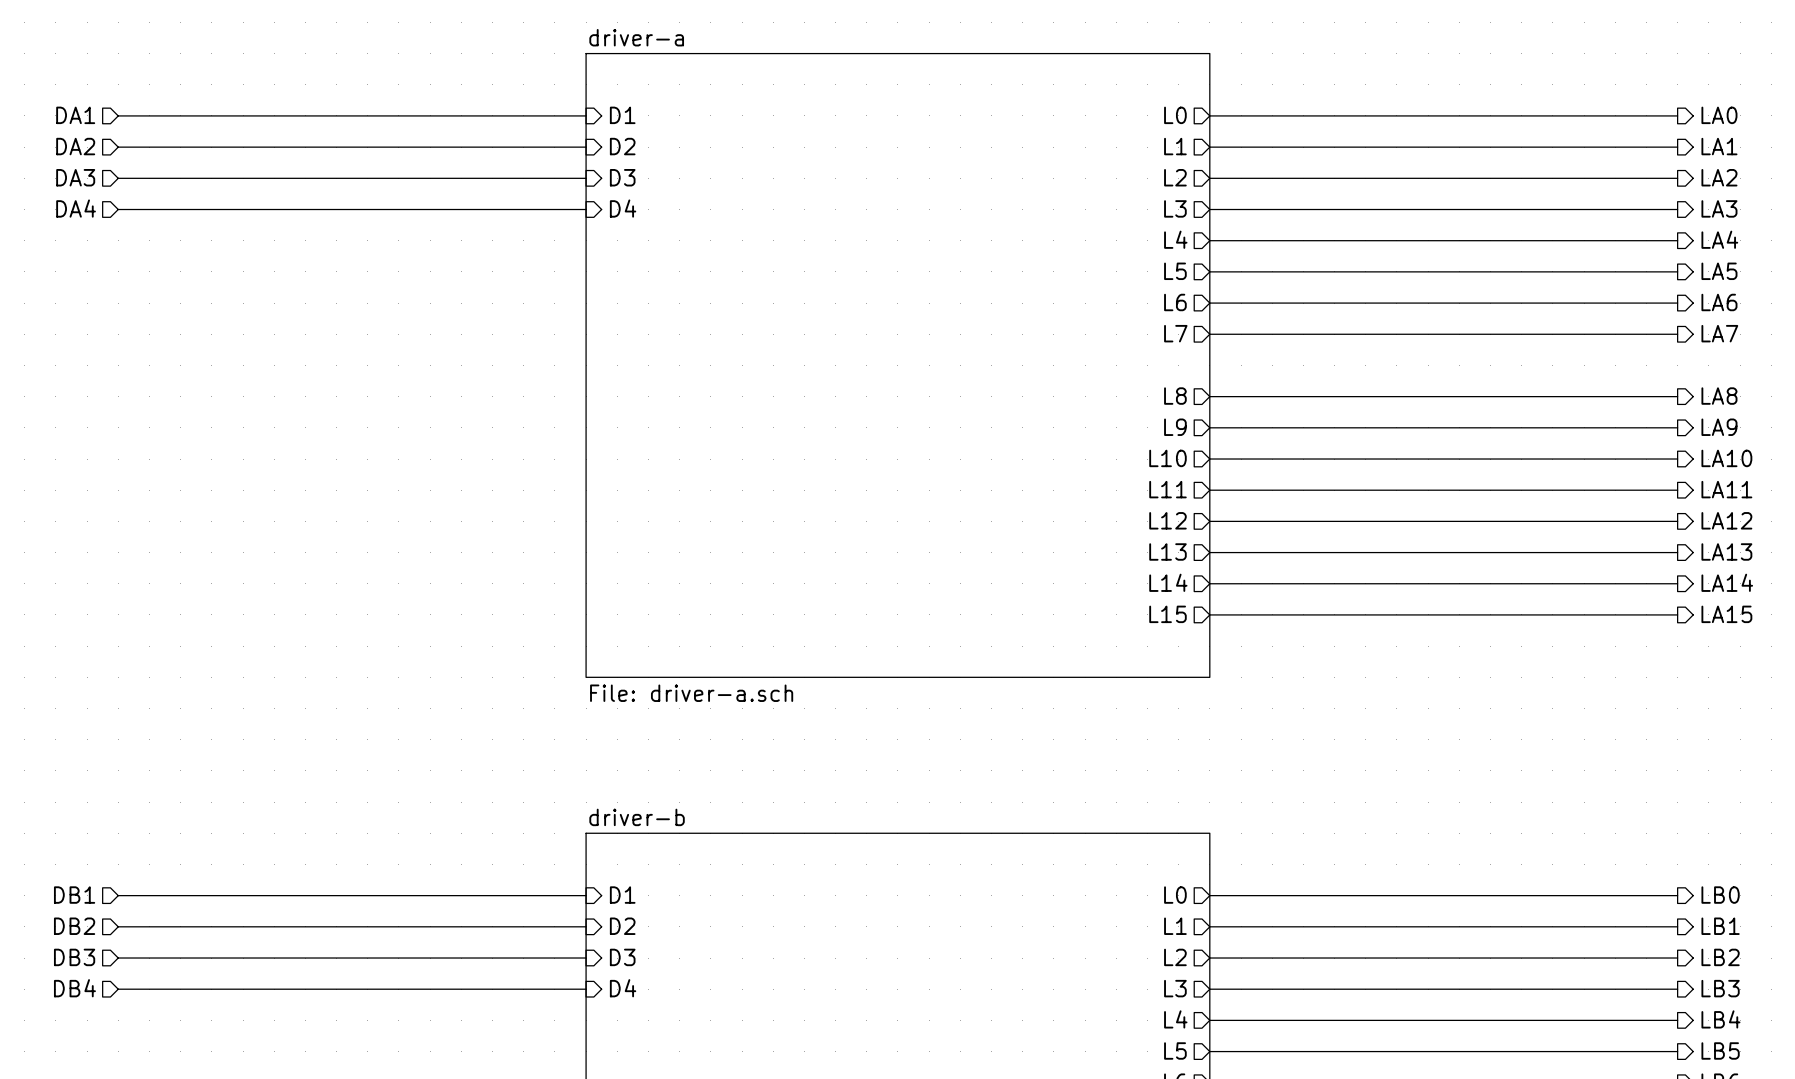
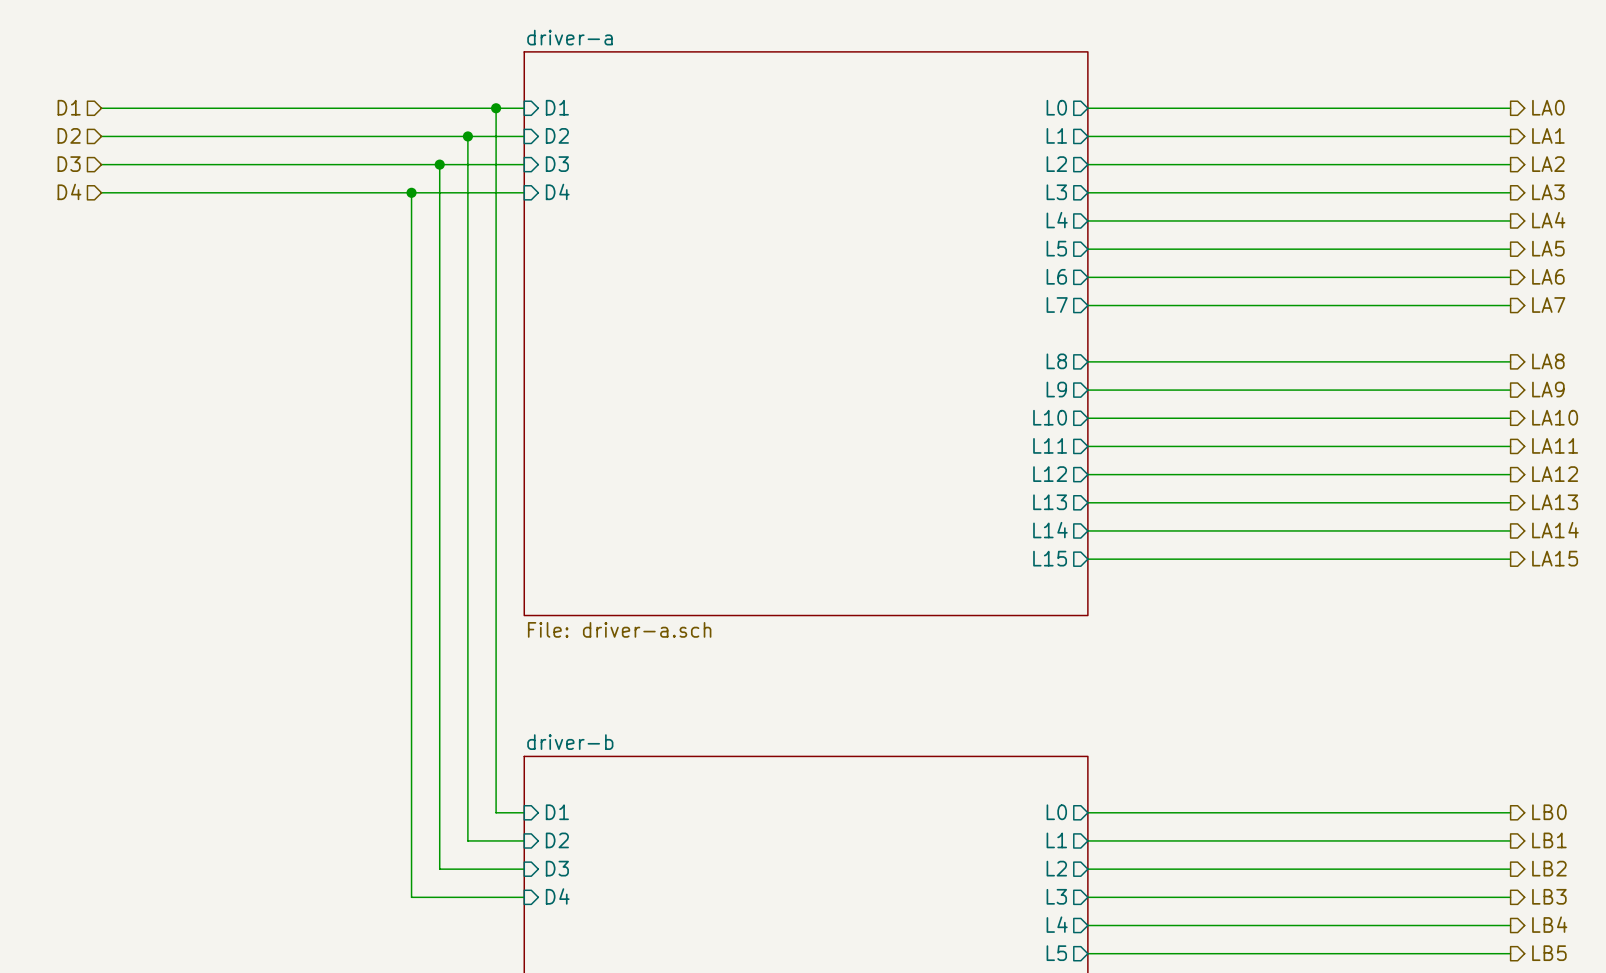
hierarchical label: DA1 (75, 115) -> D1 (69, 107)
junction: none -> (496, 108)
hierarchical label: DA2 (75, 146) -> D2 (69, 135)
junction: none -> (467, 136)
hierarchical label: DA3 (75, 177) -> D3 (69, 164)
junction: none -> (439, 164)
hierarchical label: DA4 (76, 208) -> D4 (69, 191)
junction: none -> (411, 192)
hierarchical label: DB1 (74, 895) -> none
wire: (118, 895) (554, 895) -> (496, 108) (496, 812)
hierarchical label: DB2 (74, 926) -> none
wire: (118, 926) (523, 926) -> (467, 136) (467, 840)
hierarchical label: DB3 (74, 957) -> none
wire: (118, 958) (492, 958) -> (439, 164) (439, 869)
hierarchical label: DB4 (74, 988) -> none
wire: (118, 989) (461, 989) -> (411, 192) (411, 897)

